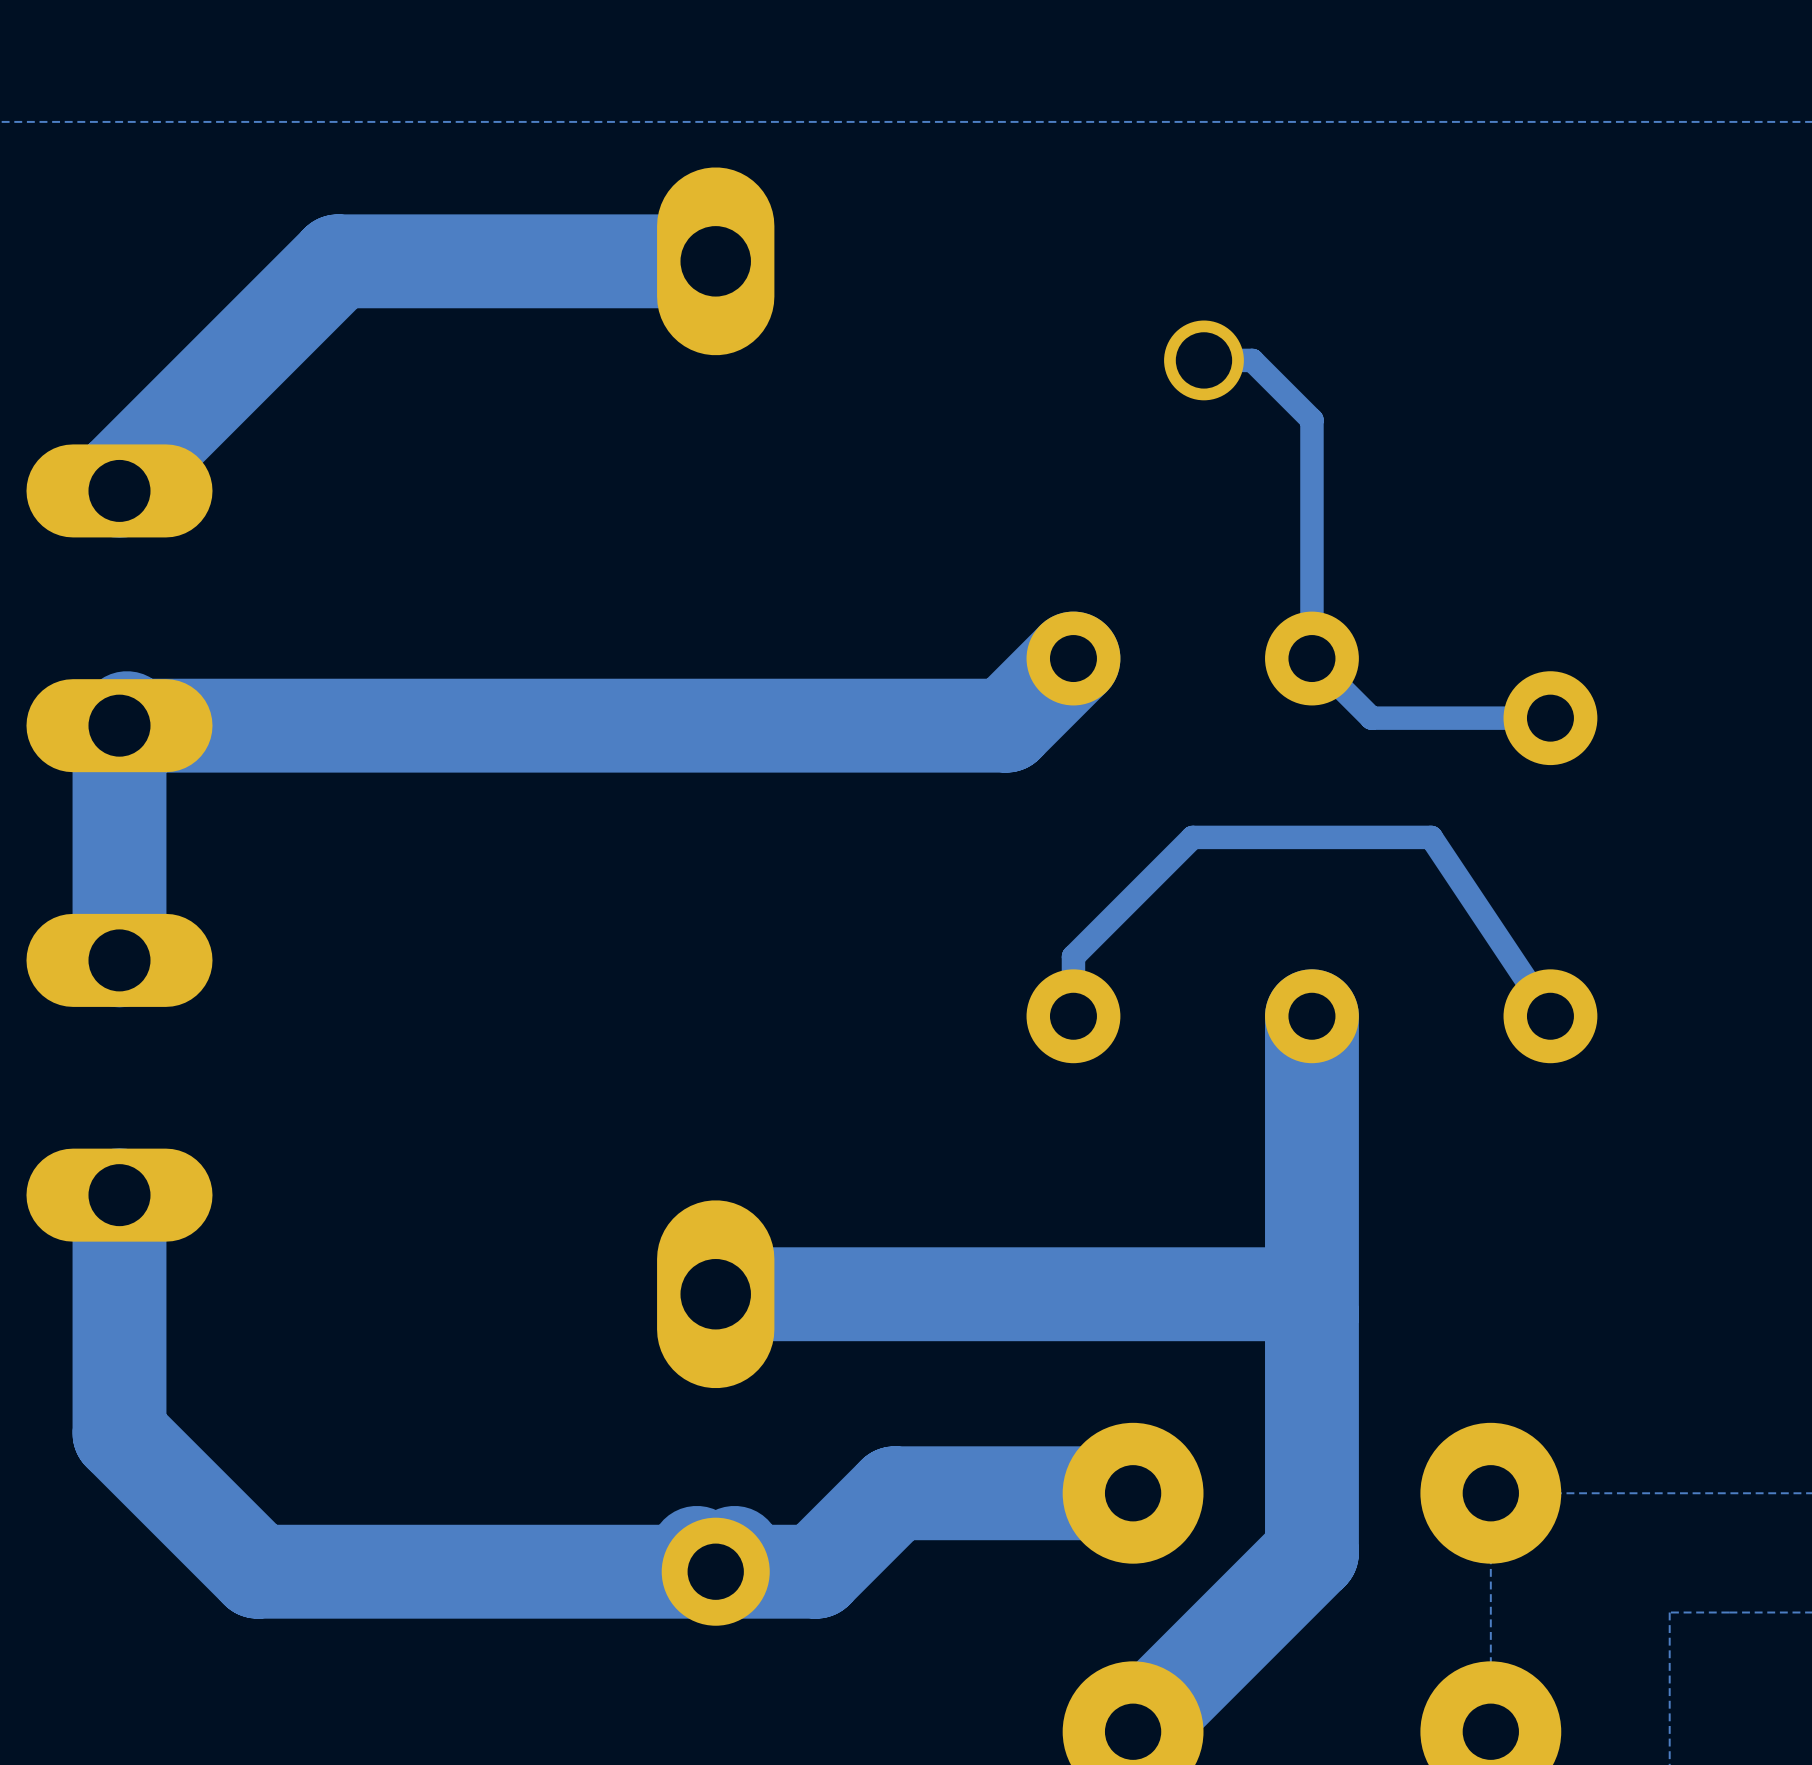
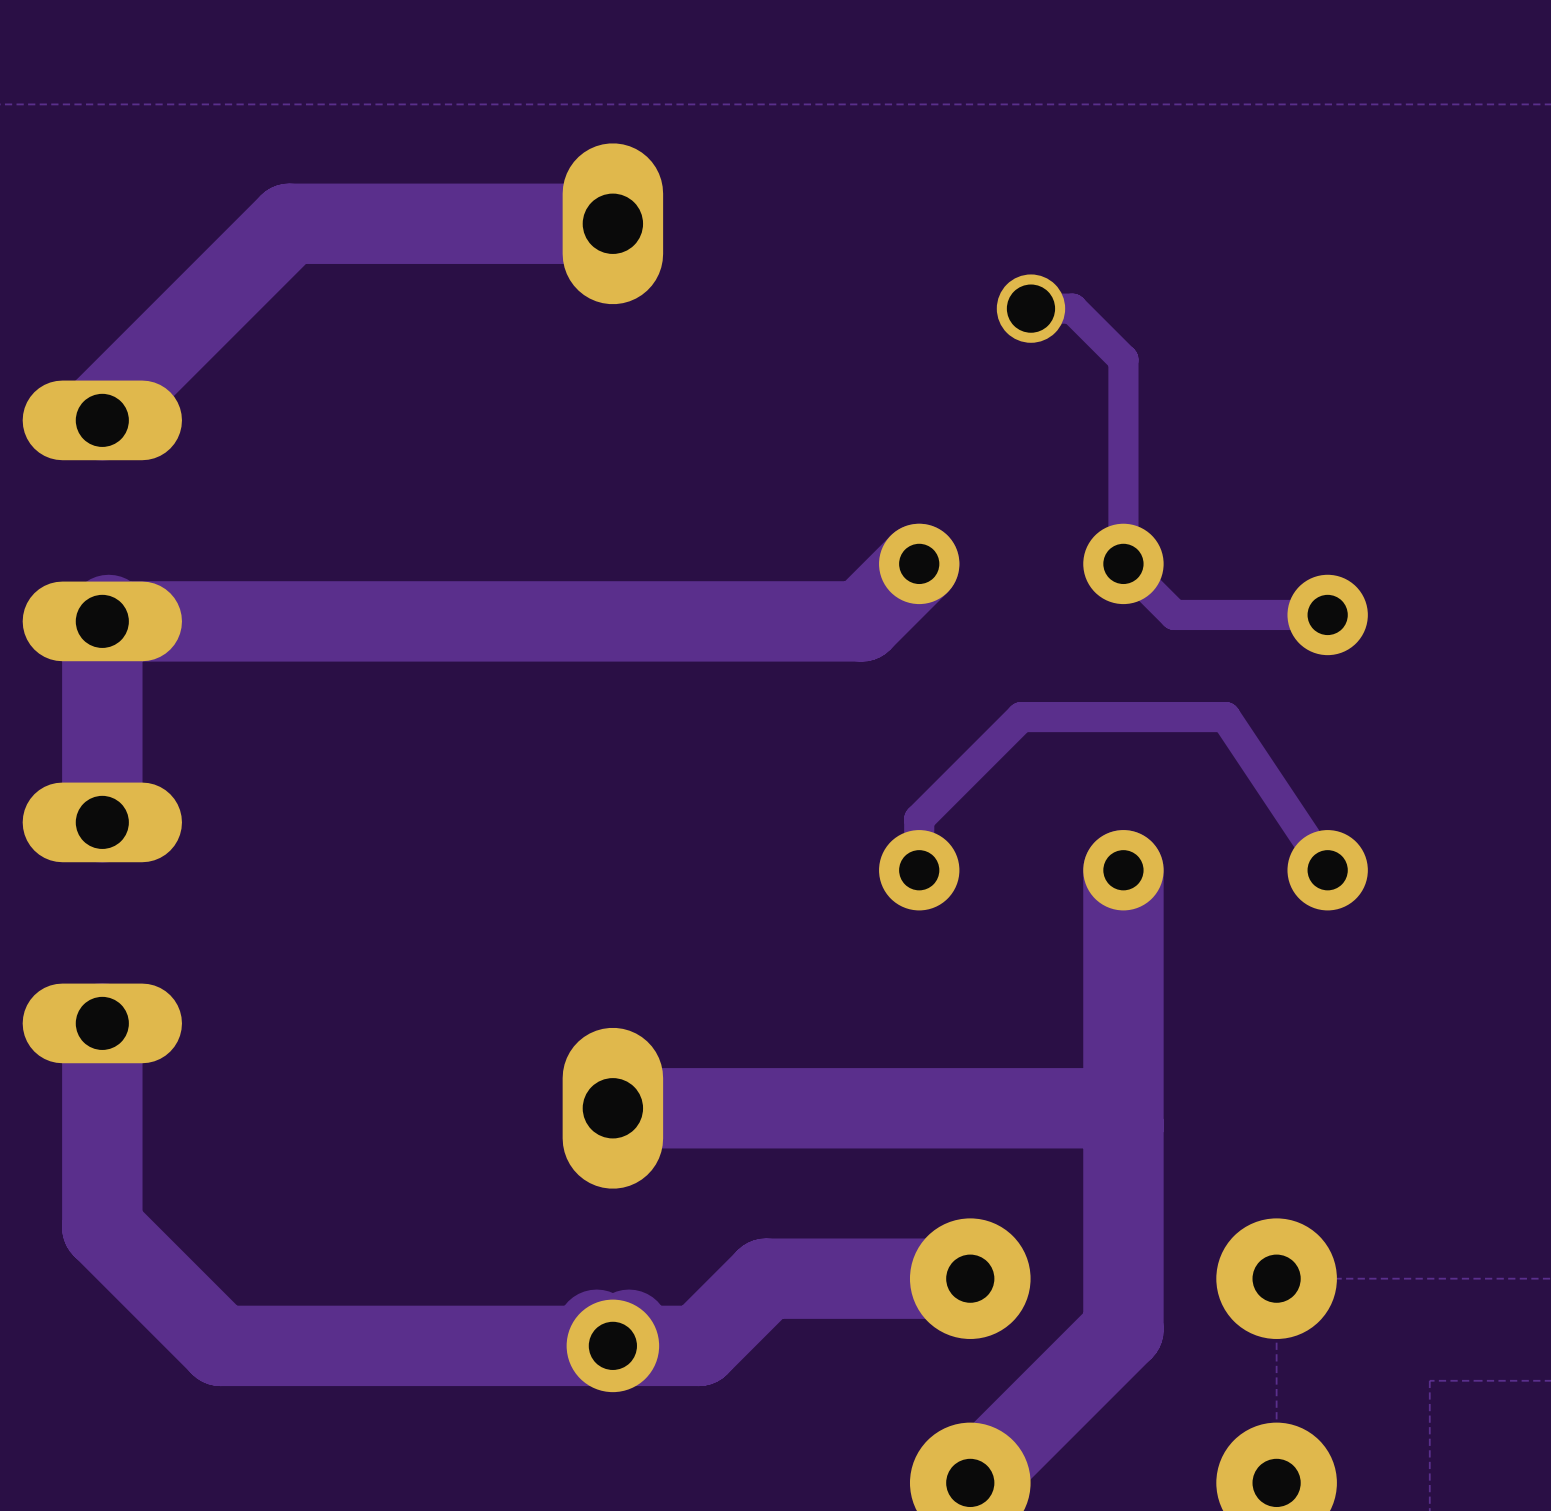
track width: thin (1203, 360) (1252, 360) (1311, 420) (1311, 658) -> thick (1030, 308) (1072, 308) (1123, 359) (1123, 563)
track width: thin (1323, 669) (1371, 718) (1550, 718) -> thick (1133, 573) (1174, 614) (1327, 614)
track width: thin (1550, 1016) (1431, 837) (1192, 837) (1073, 956) (1073, 1016) -> thick (1327, 870) (1225, 717) (1021, 717) (919, 819) (919, 870)

